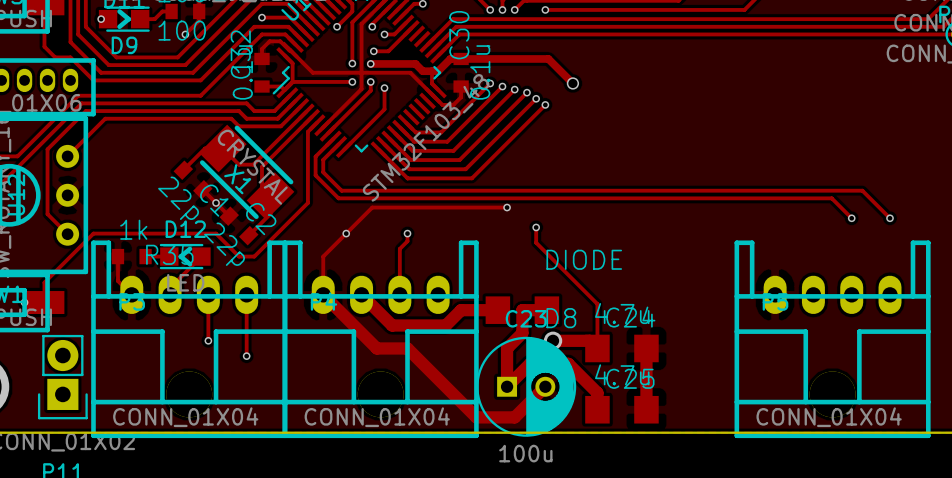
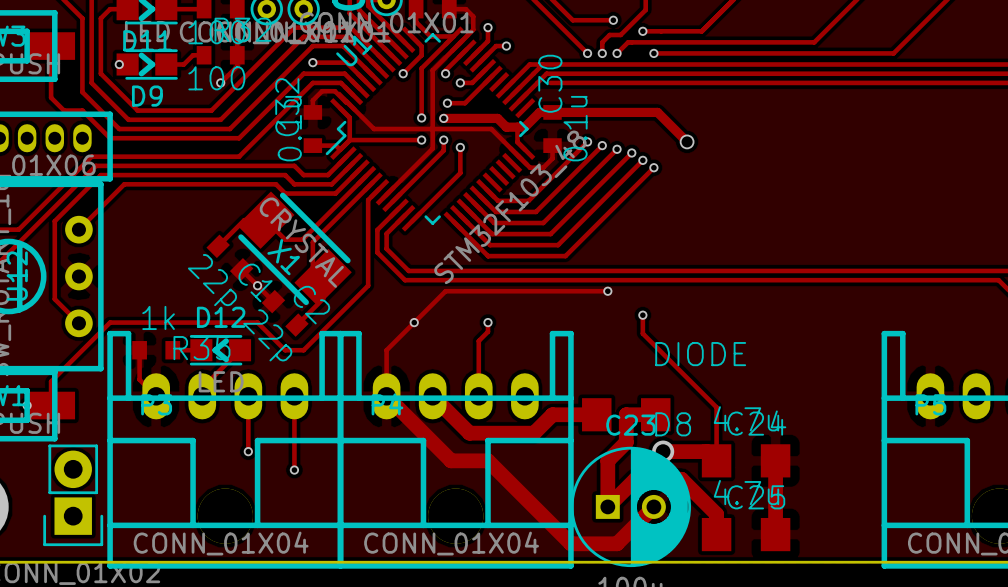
track: none -> (542, 64) (529, 64) (505, 88)
track: (459, 34) (438, 55) -> none

